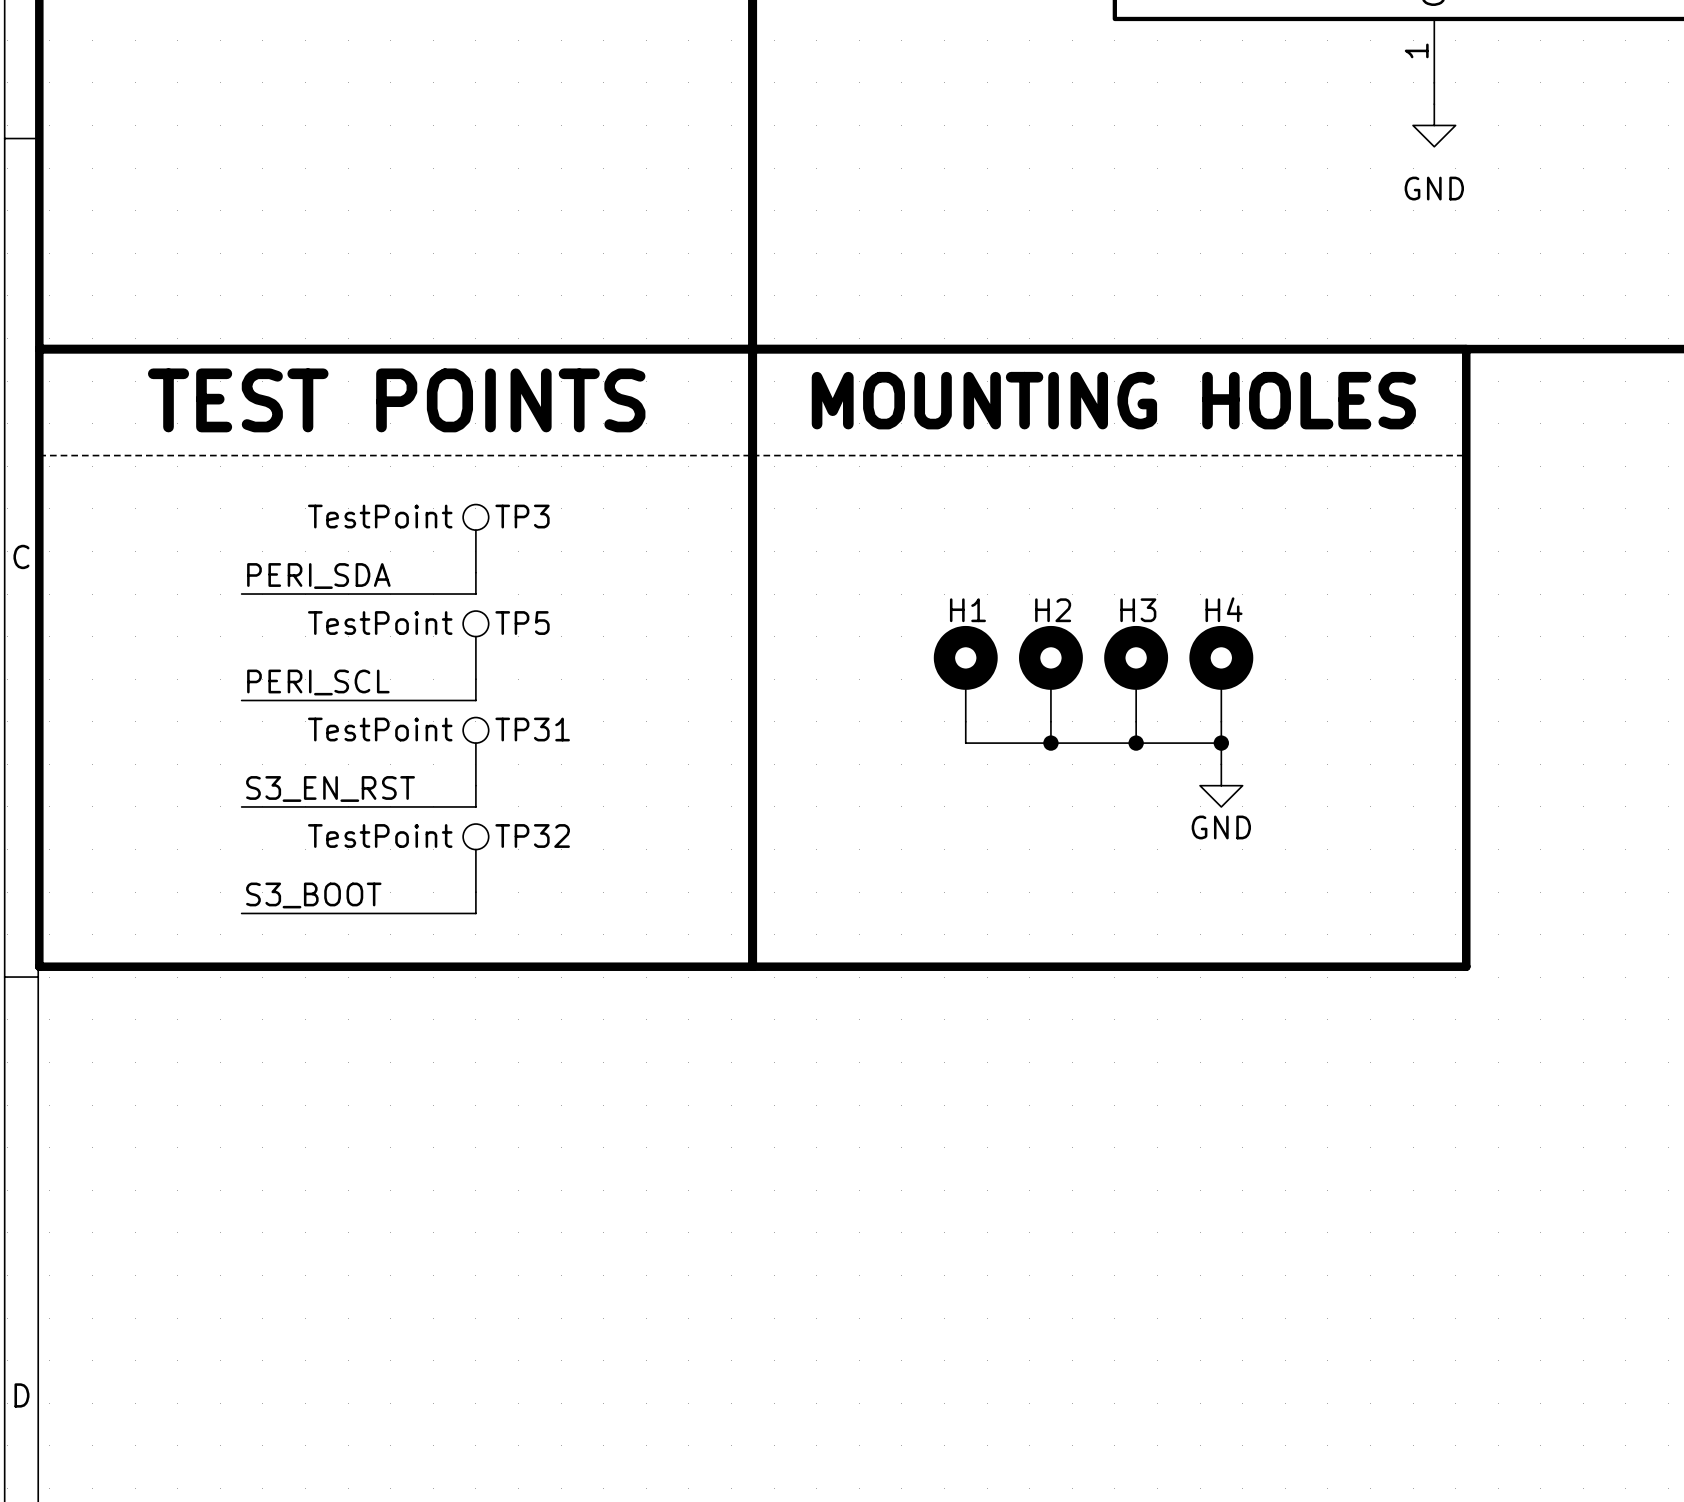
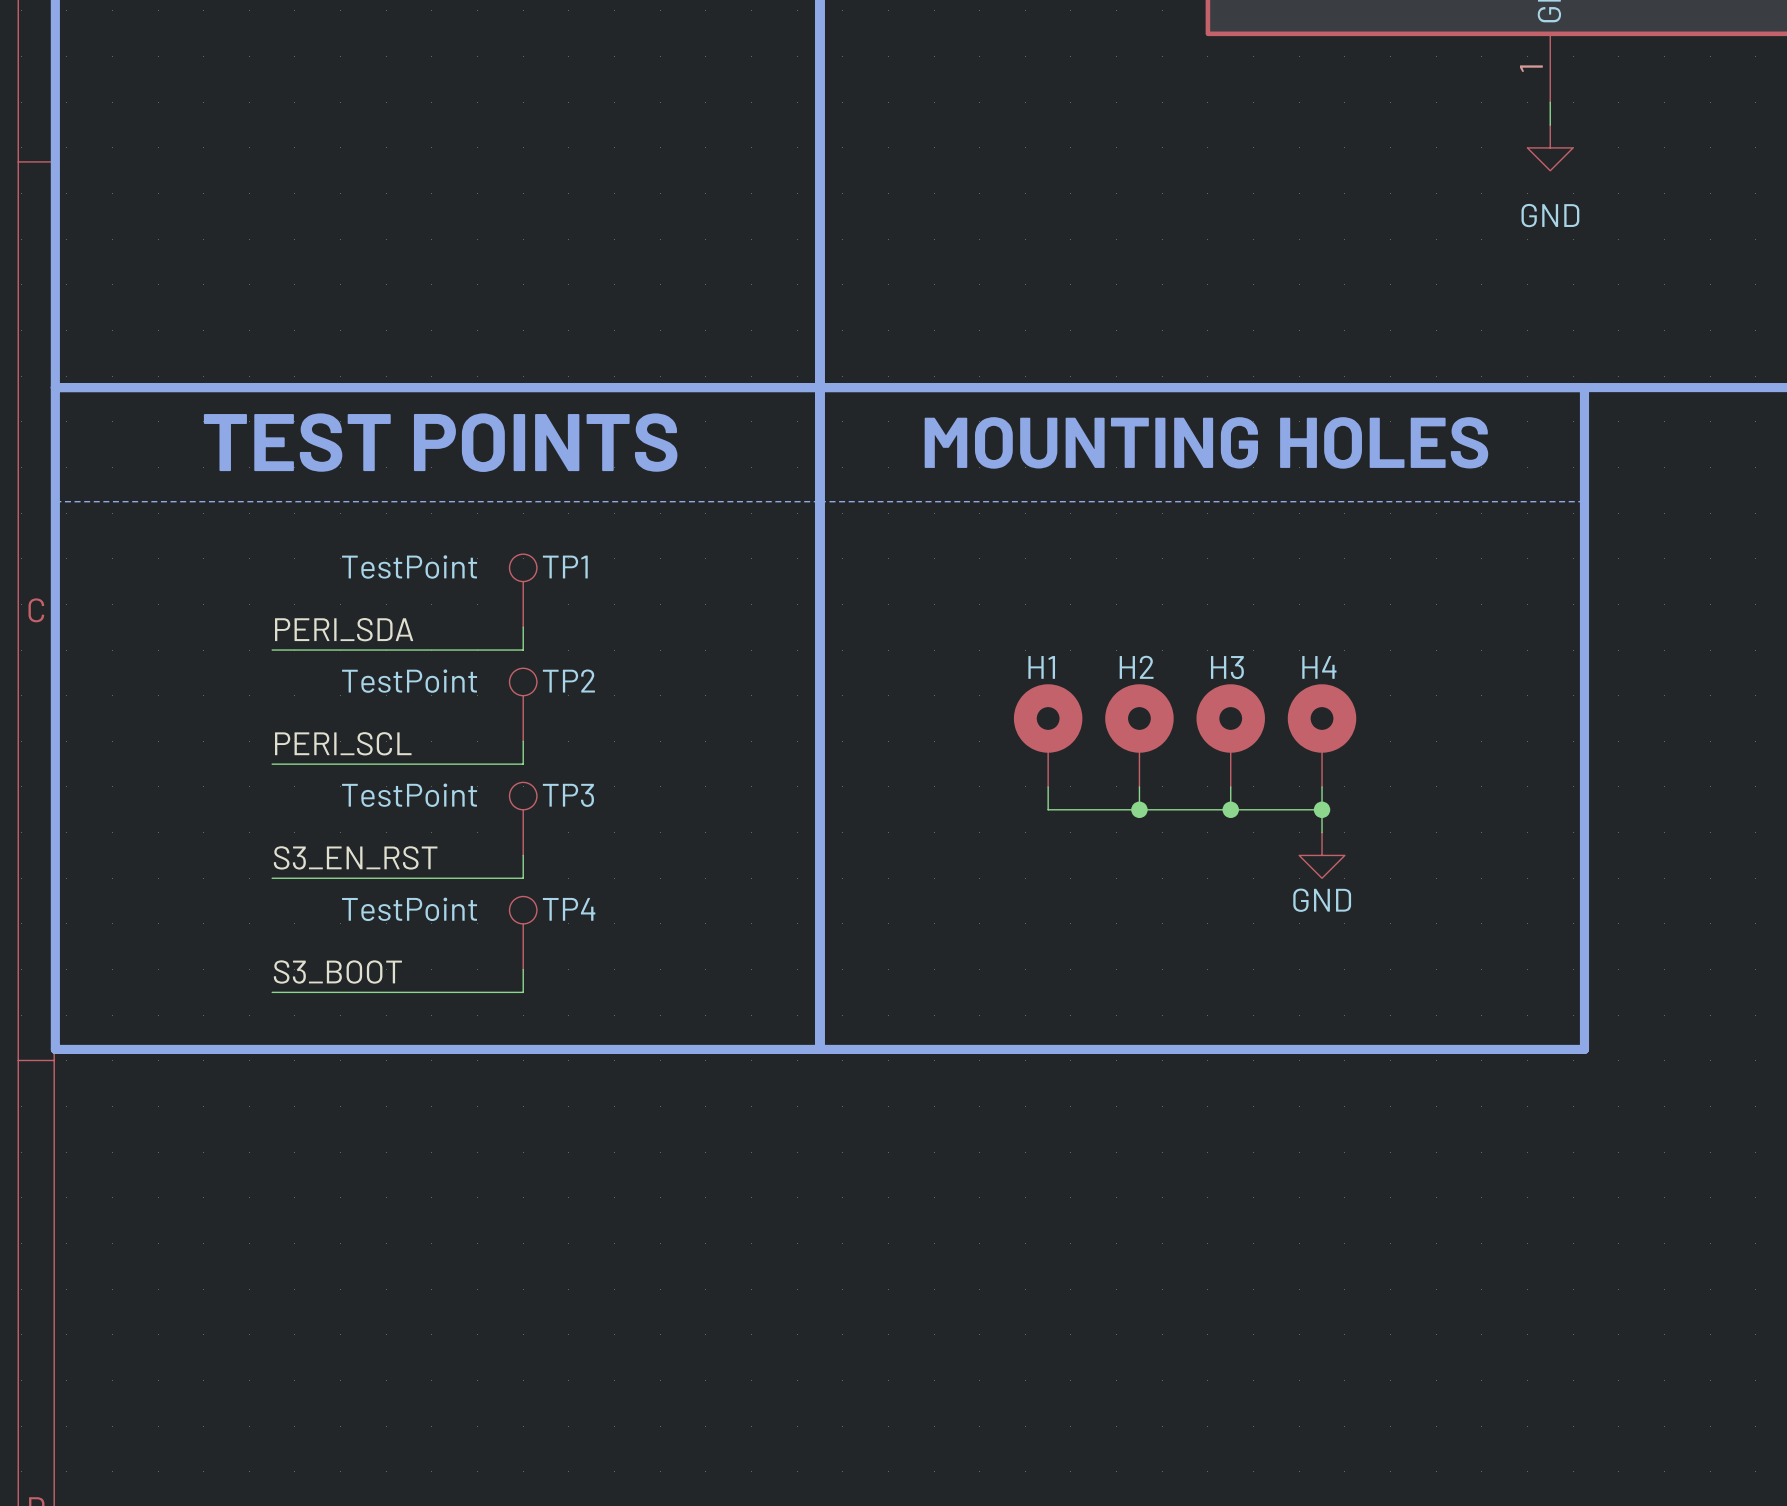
TP3 name: TP3 (522, 516) -> TP1 (565, 567)
TP5 name: TP5 (522, 623) -> TP2 (568, 681)
TP31 name: TP31 (532, 729) -> TP3 (568, 795)
TP32 name: TP32 (532, 836) -> TP4 (569, 909)

